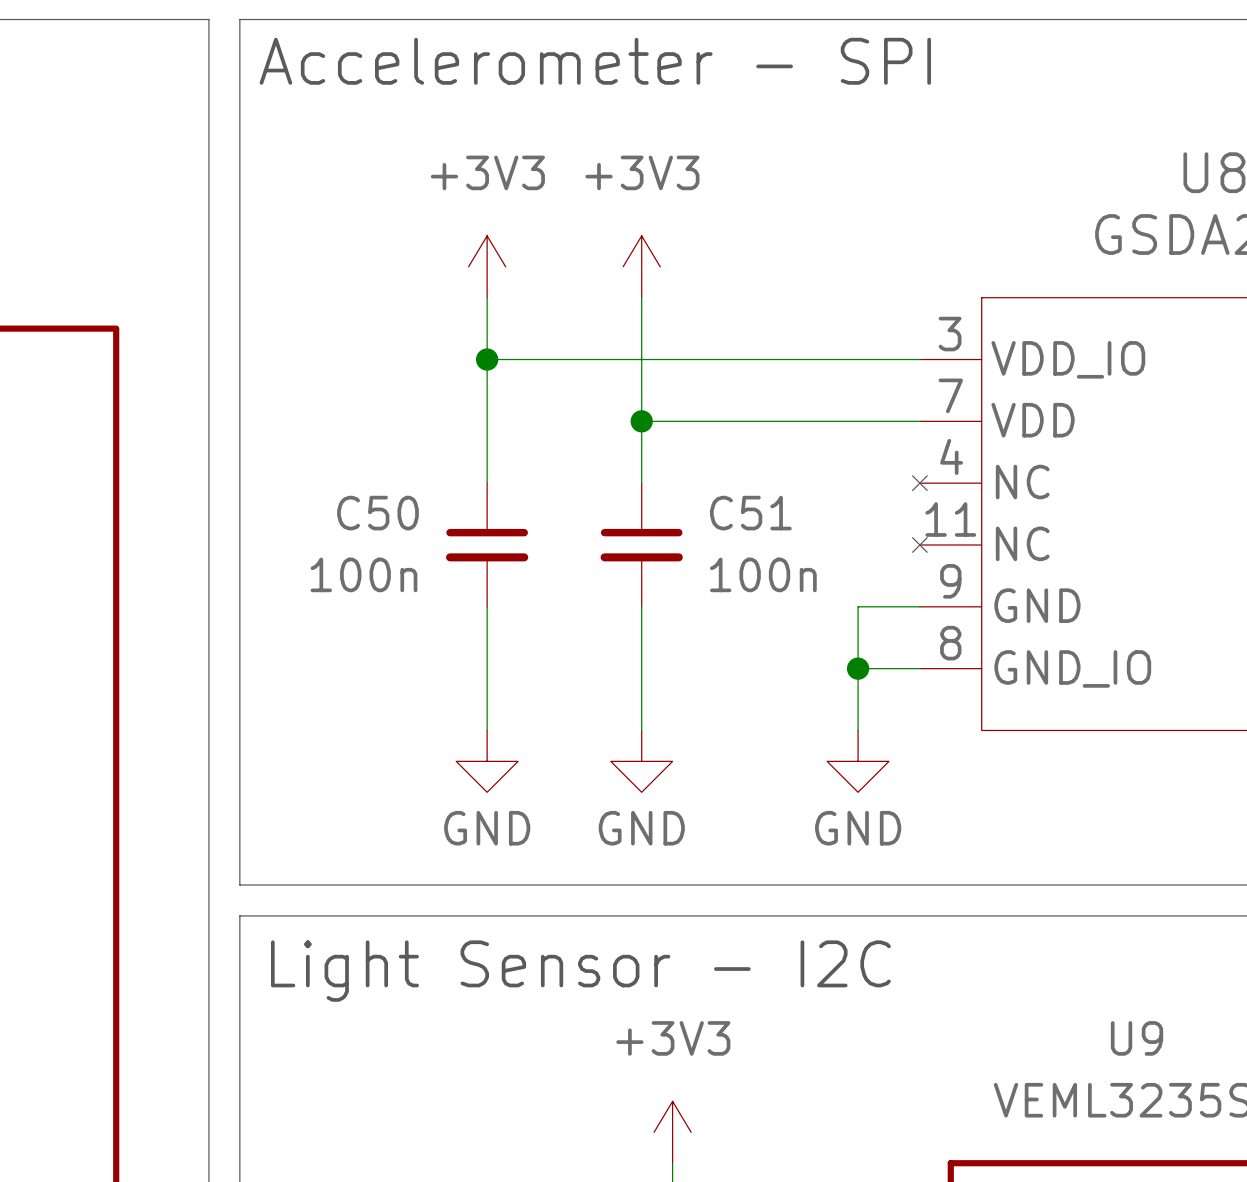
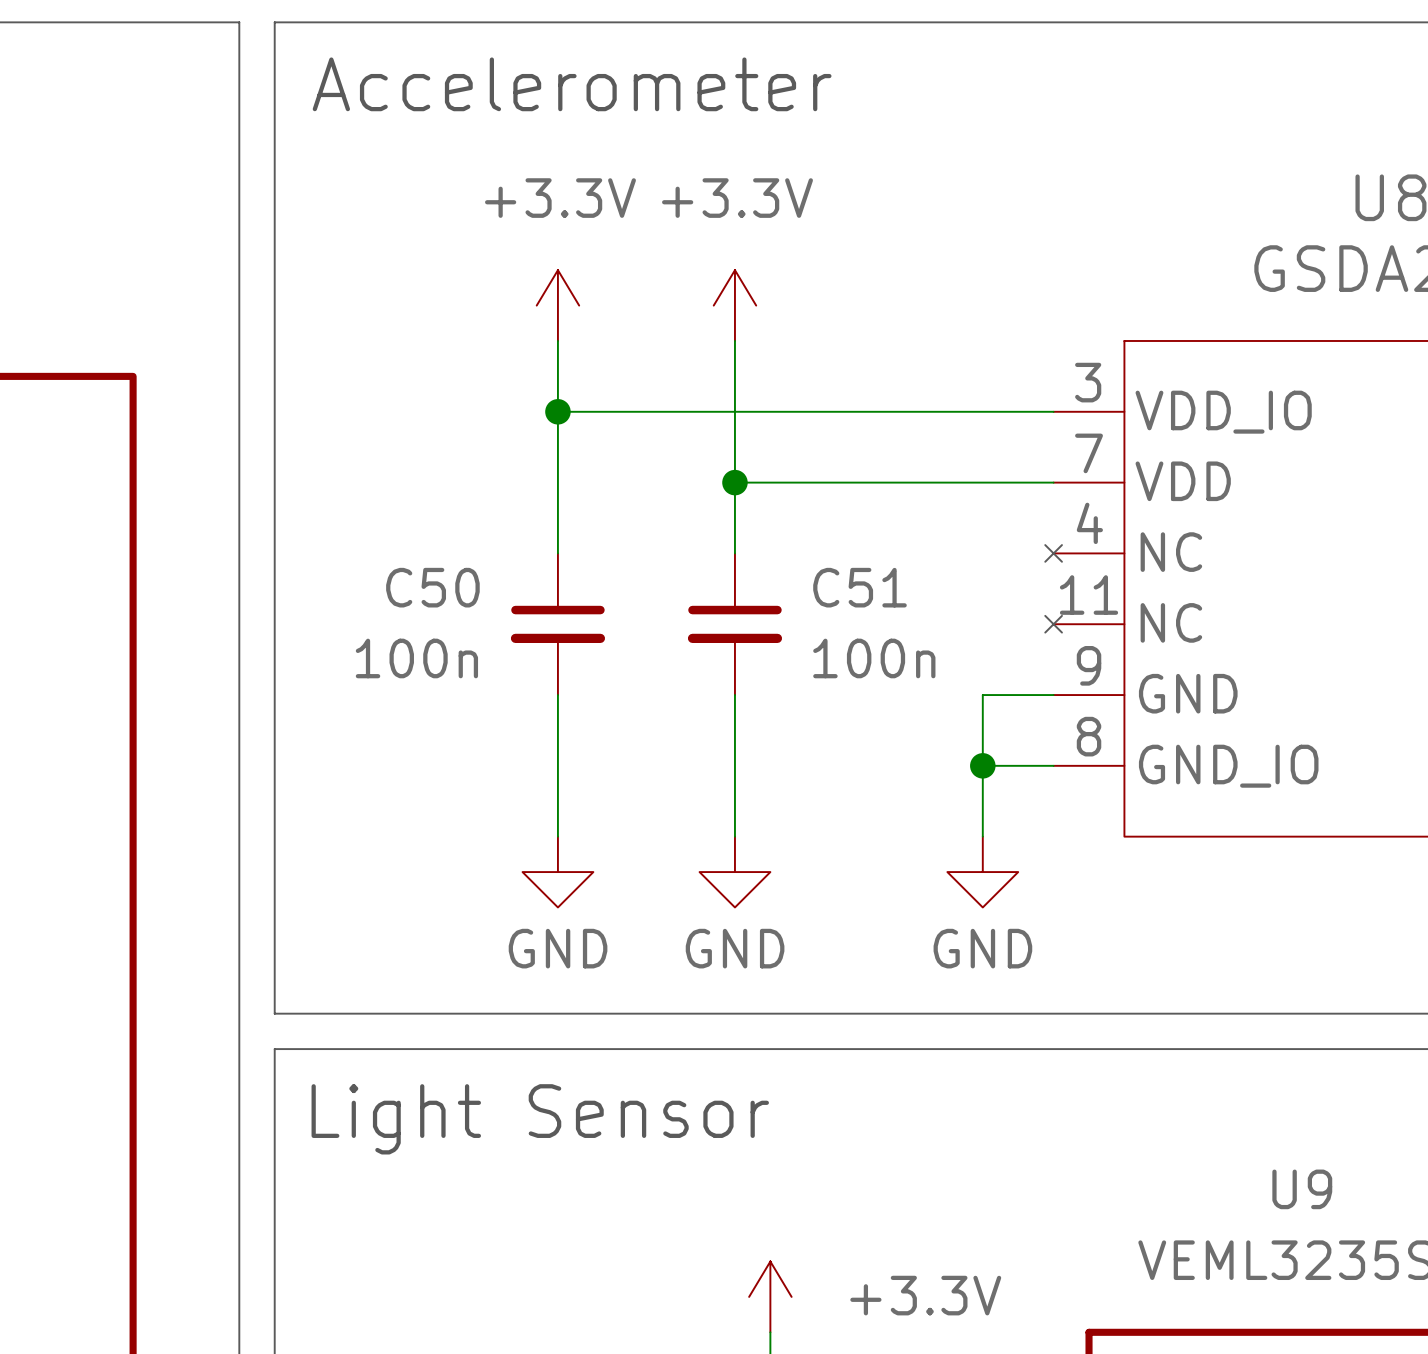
text: Accelerometer - SPI (595, 61) -> Accelerometer (572, 84)
power symbol: +3V3 (487, 266) -> +3.3V (557, 305)
power symbol: +3V3 (641, 266) -> +3.3V (734, 305)
text: Light Sensor - I2C (580, 971) -> Light Sensor (540, 1119)
power symbol: +3V3 (672, 1132) -> +3.3V (770, 1296)

